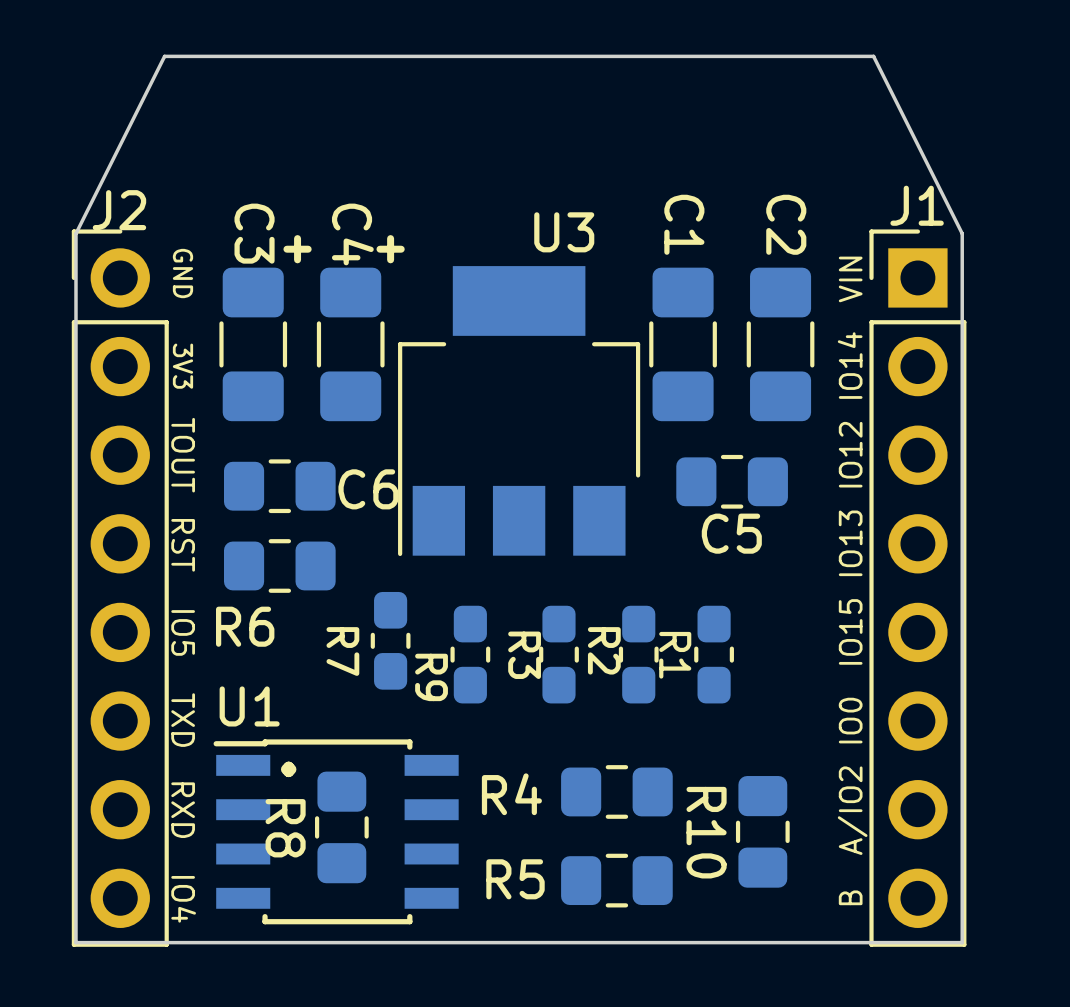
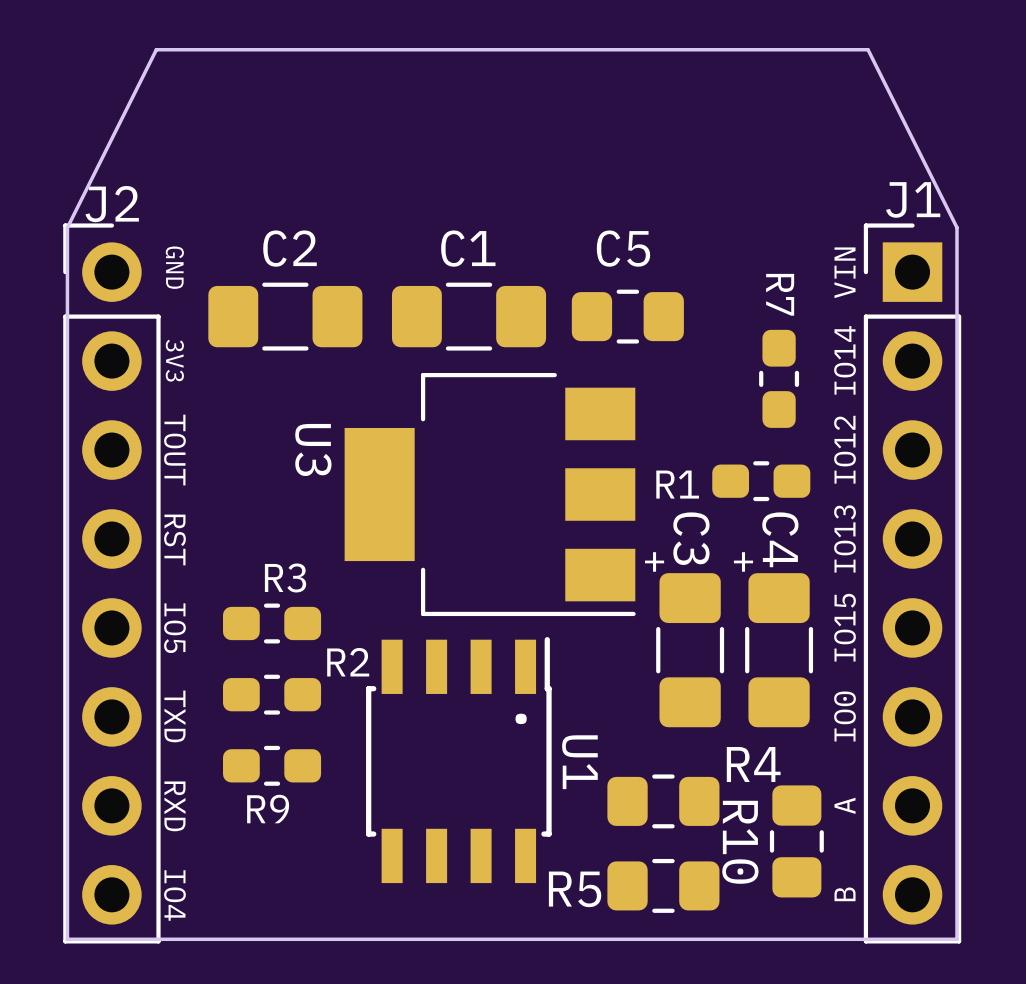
text: + (297, 249) -> none
text: + (390, 249) -> none
C3 position: (253, 344) -> (690, 650)
C4 position: (350, 344) -> (779, 650)
C1 rotation: 0° (683, 344) -> 90° clockwise (469, 316)
C1 position: (683, 344) -> (469, 316)
C2 rotation: 0° (780, 344) -> 90° clockwise (285, 316)
C2 position: (780, 344) -> (285, 316)
U3 rotation: 0° (519, 411) -> 90° counterclockwise (490, 494)
C5 position: (732, 481) -> (627, 316)
C6: (279, 486) -> none
C5 name position: C5 (731, 533) -> C5 (623, 248)
R6: (279, 565) -> none
text: none -> + (654, 561)
text: none -> + (743, 561)
R7 position: (390, 640) -> (779, 378)
R2 name position: R2 (604, 650) -> R2 (348, 662)
R7 name position: R7 (342, 651) -> R7 (780, 294)
R9 rotation: 0° (470, 654) -> 90° clockwise (272, 765)
R9 position: (470, 654) -> (272, 765)
R3 rotation: 0° (558, 654) -> 90° clockwise (272, 623)
R3 position: (558, 654) -> (272, 623)
R2 rotation: 0° (638, 654) -> 90° clockwise (272, 694)
R2 position: (638, 654) -> (272, 694)
R1 rotation: 0° (714, 654) -> 90° clockwise (761, 481)
R1 position: (714, 654) -> (761, 481)
U1 name position: U1 (249, 706) -> U1 (579, 762)
text position: . (288, 769) -> . (521, 718)
R4 position: (616, 791) -> (663, 801)
R4 name position: R4 (511, 794) -> R4 (753, 764)
text: A/IO2 (852, 810) -> A (845, 805)
R8: (341, 827) -> none
U1 rotation: 0° (336, 831) -> 90° clockwise (458, 760)
R10 position: (762, 831) -> (796, 841)
R5 name position: R5 (515, 879) -> R5 (575, 889)
R5 position: (616, 880) -> (663, 885)

